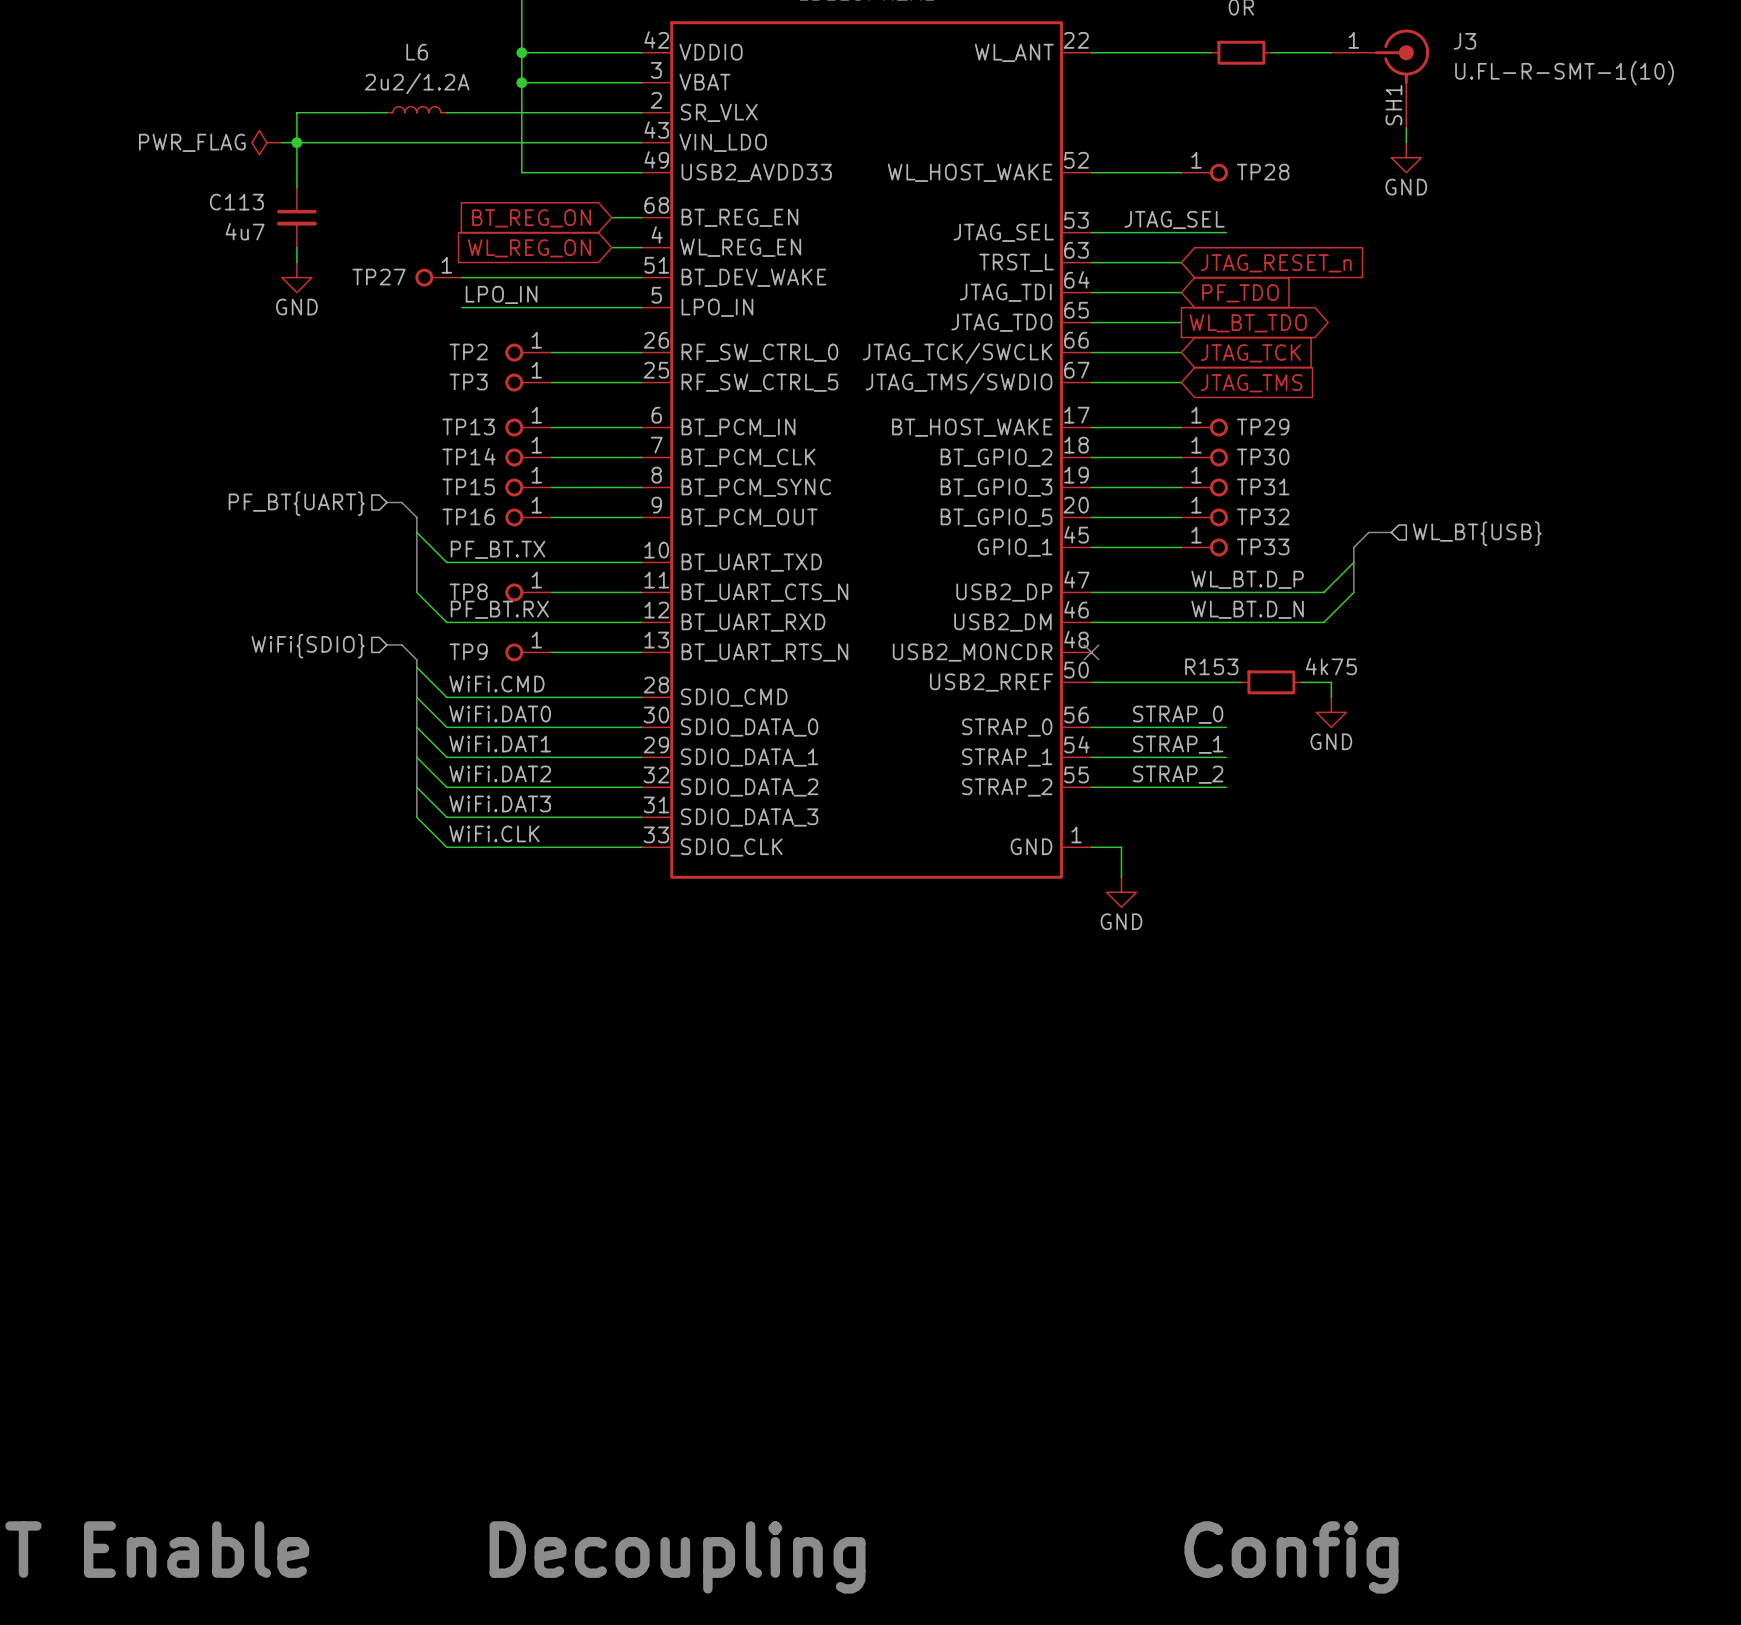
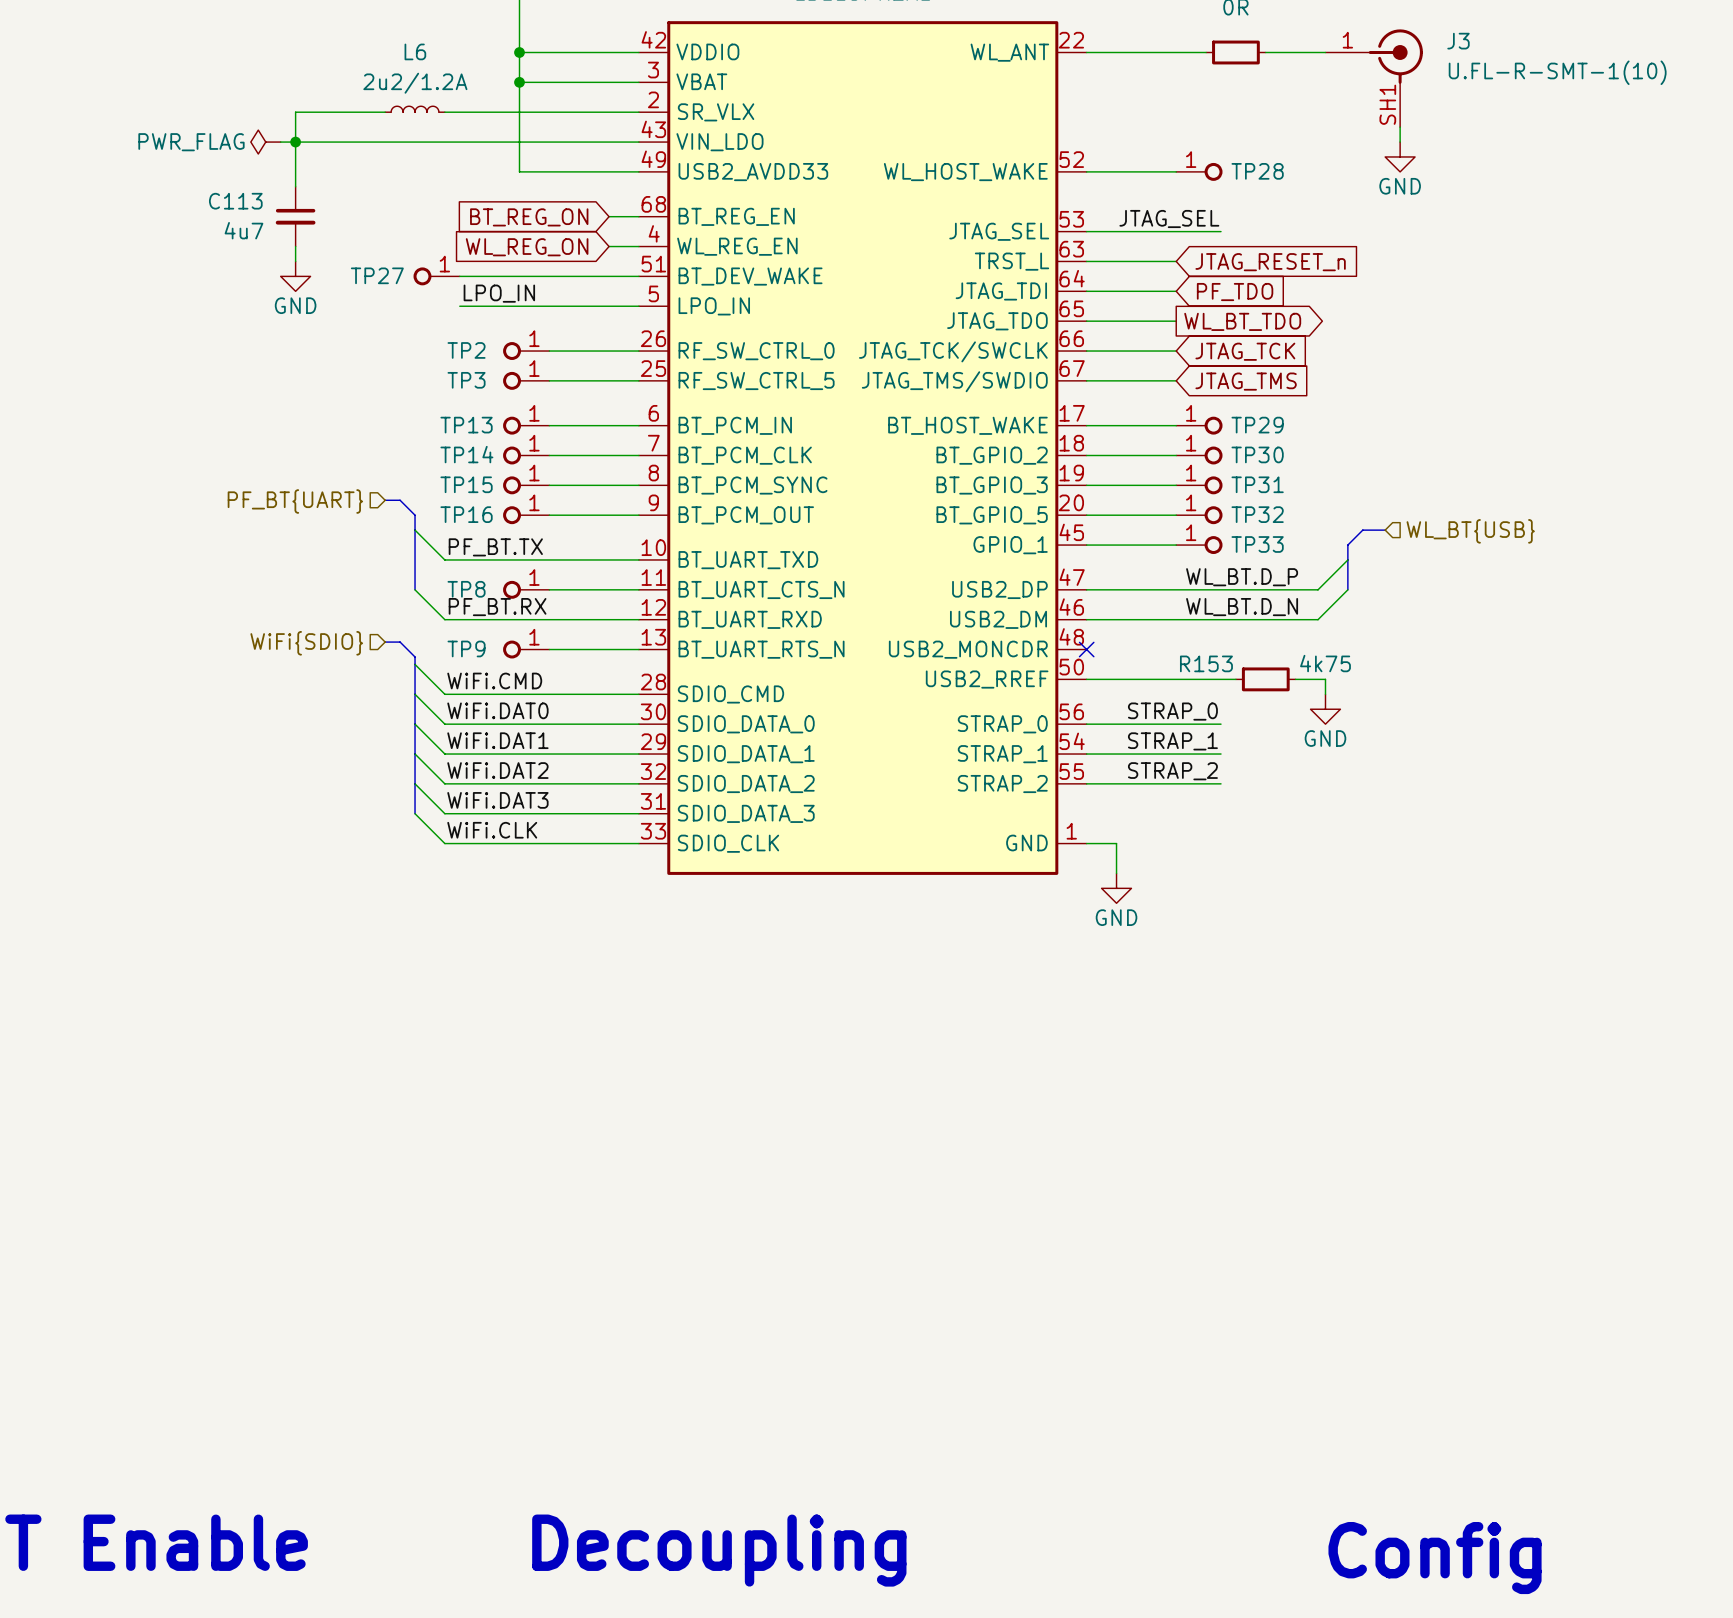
text position: Decoupling (677, 1557) -> Decoupling (719, 1550)
text position: Config (1291, 1557) -> Config (1435, 1558)

